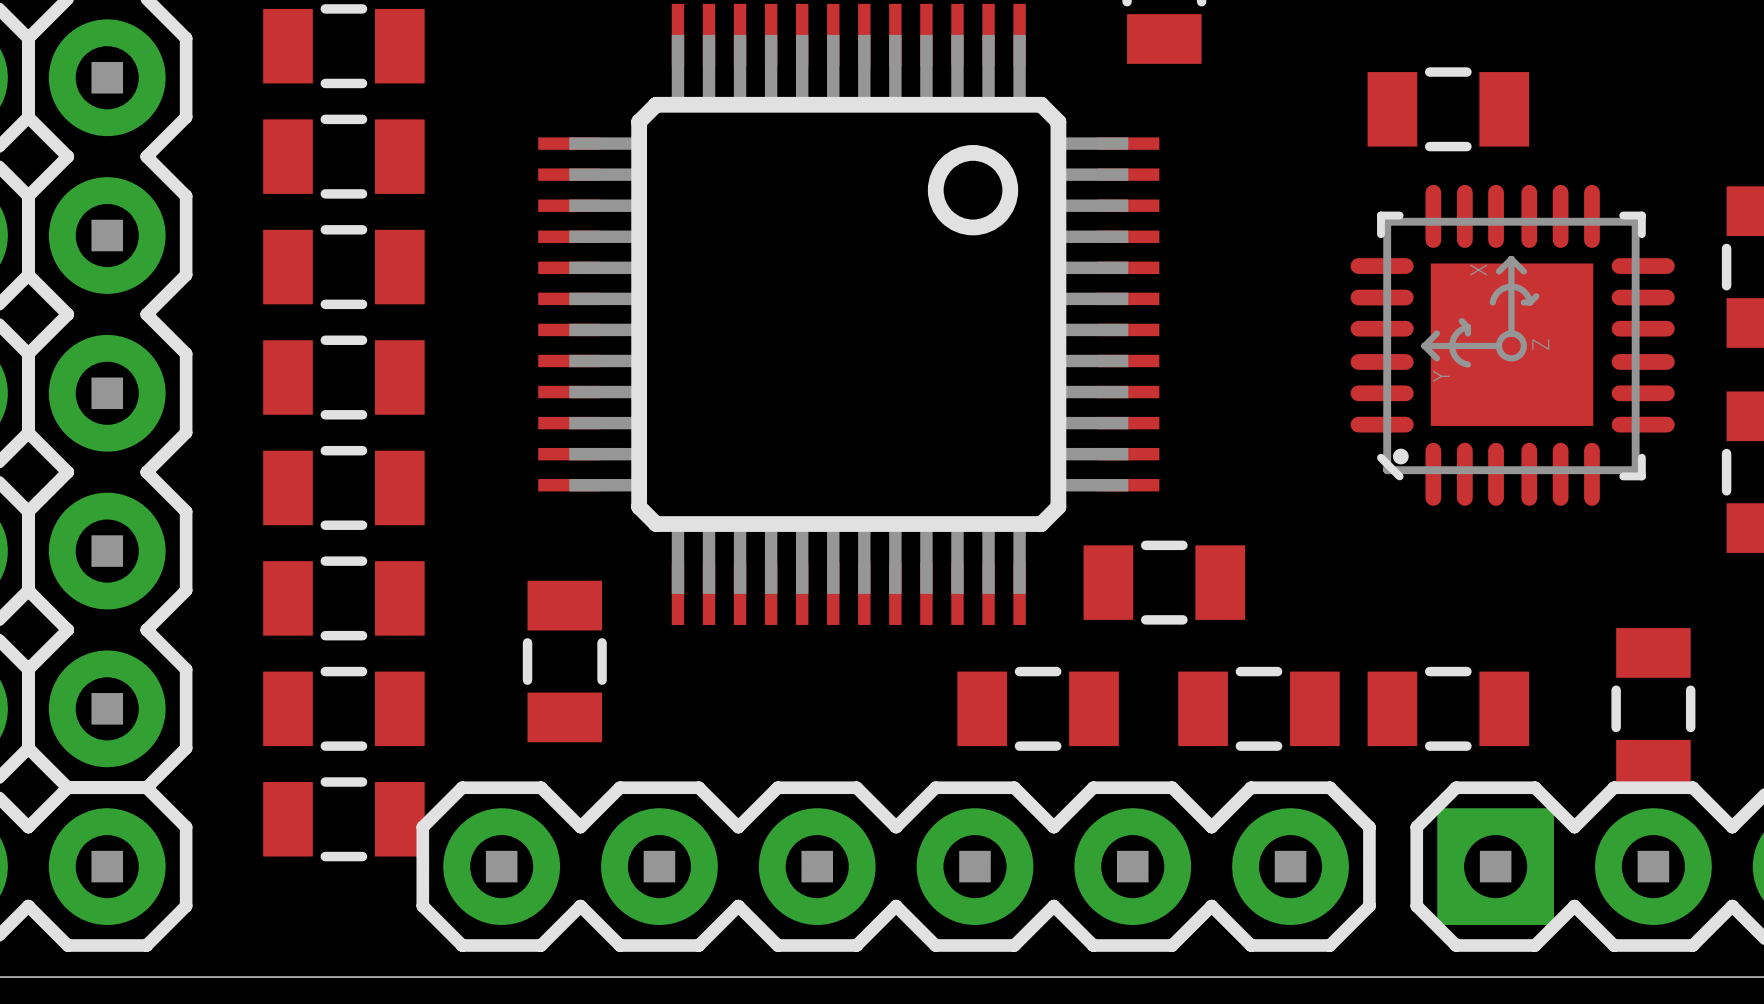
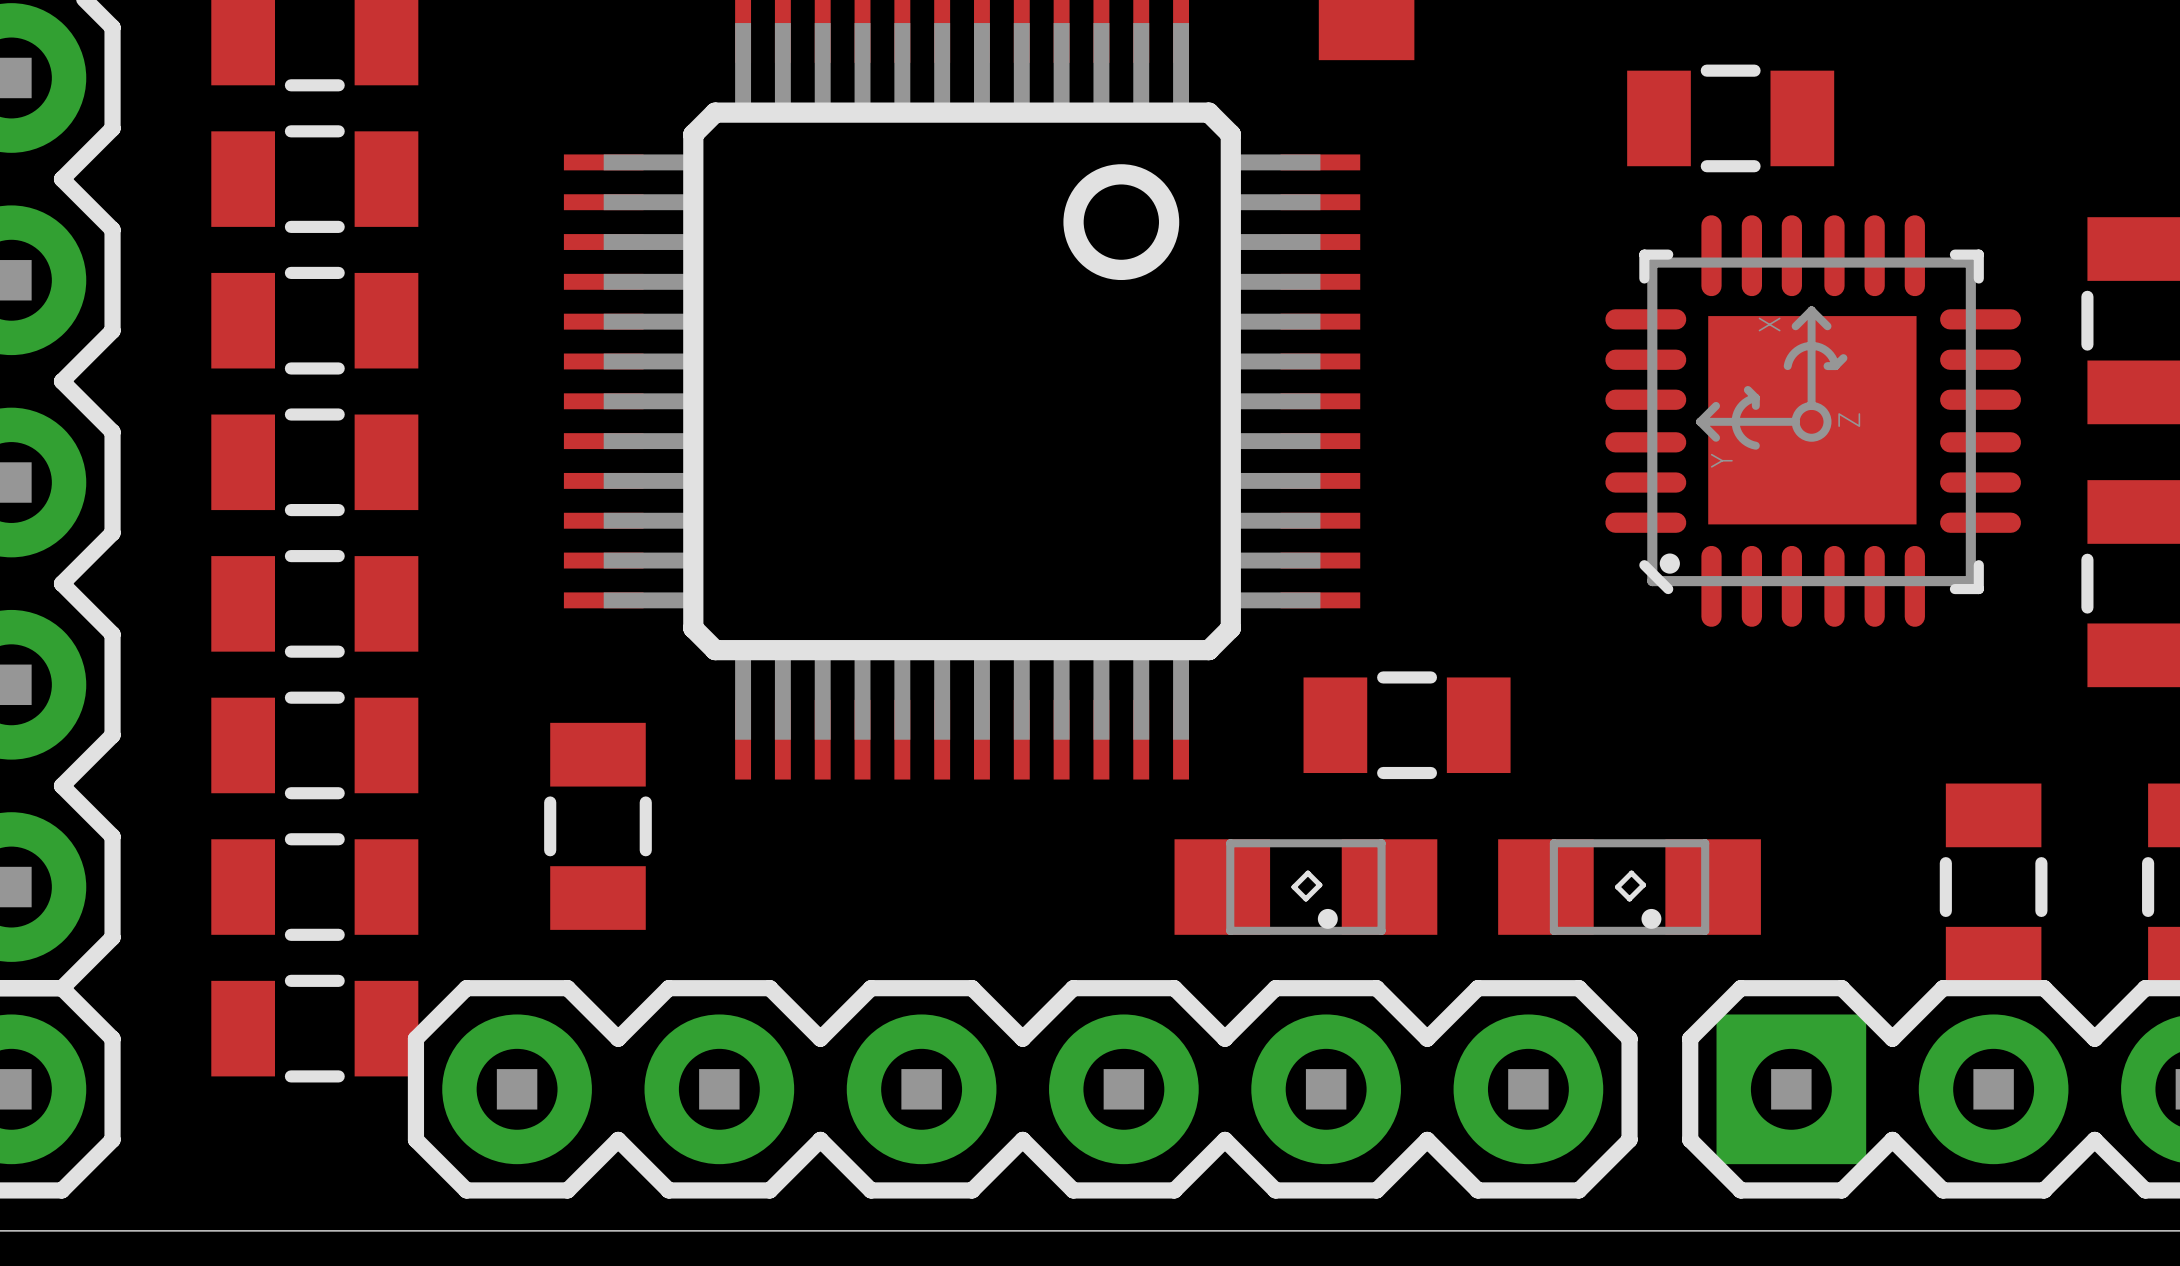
part position: (1164, 582) -> (1407, 725)
part: (1038, 708) -> none
part: none -> (1305, 887)
part: (1258, 708) -> none
part: none -> (1629, 887)
part: (1448, 708) -> none

